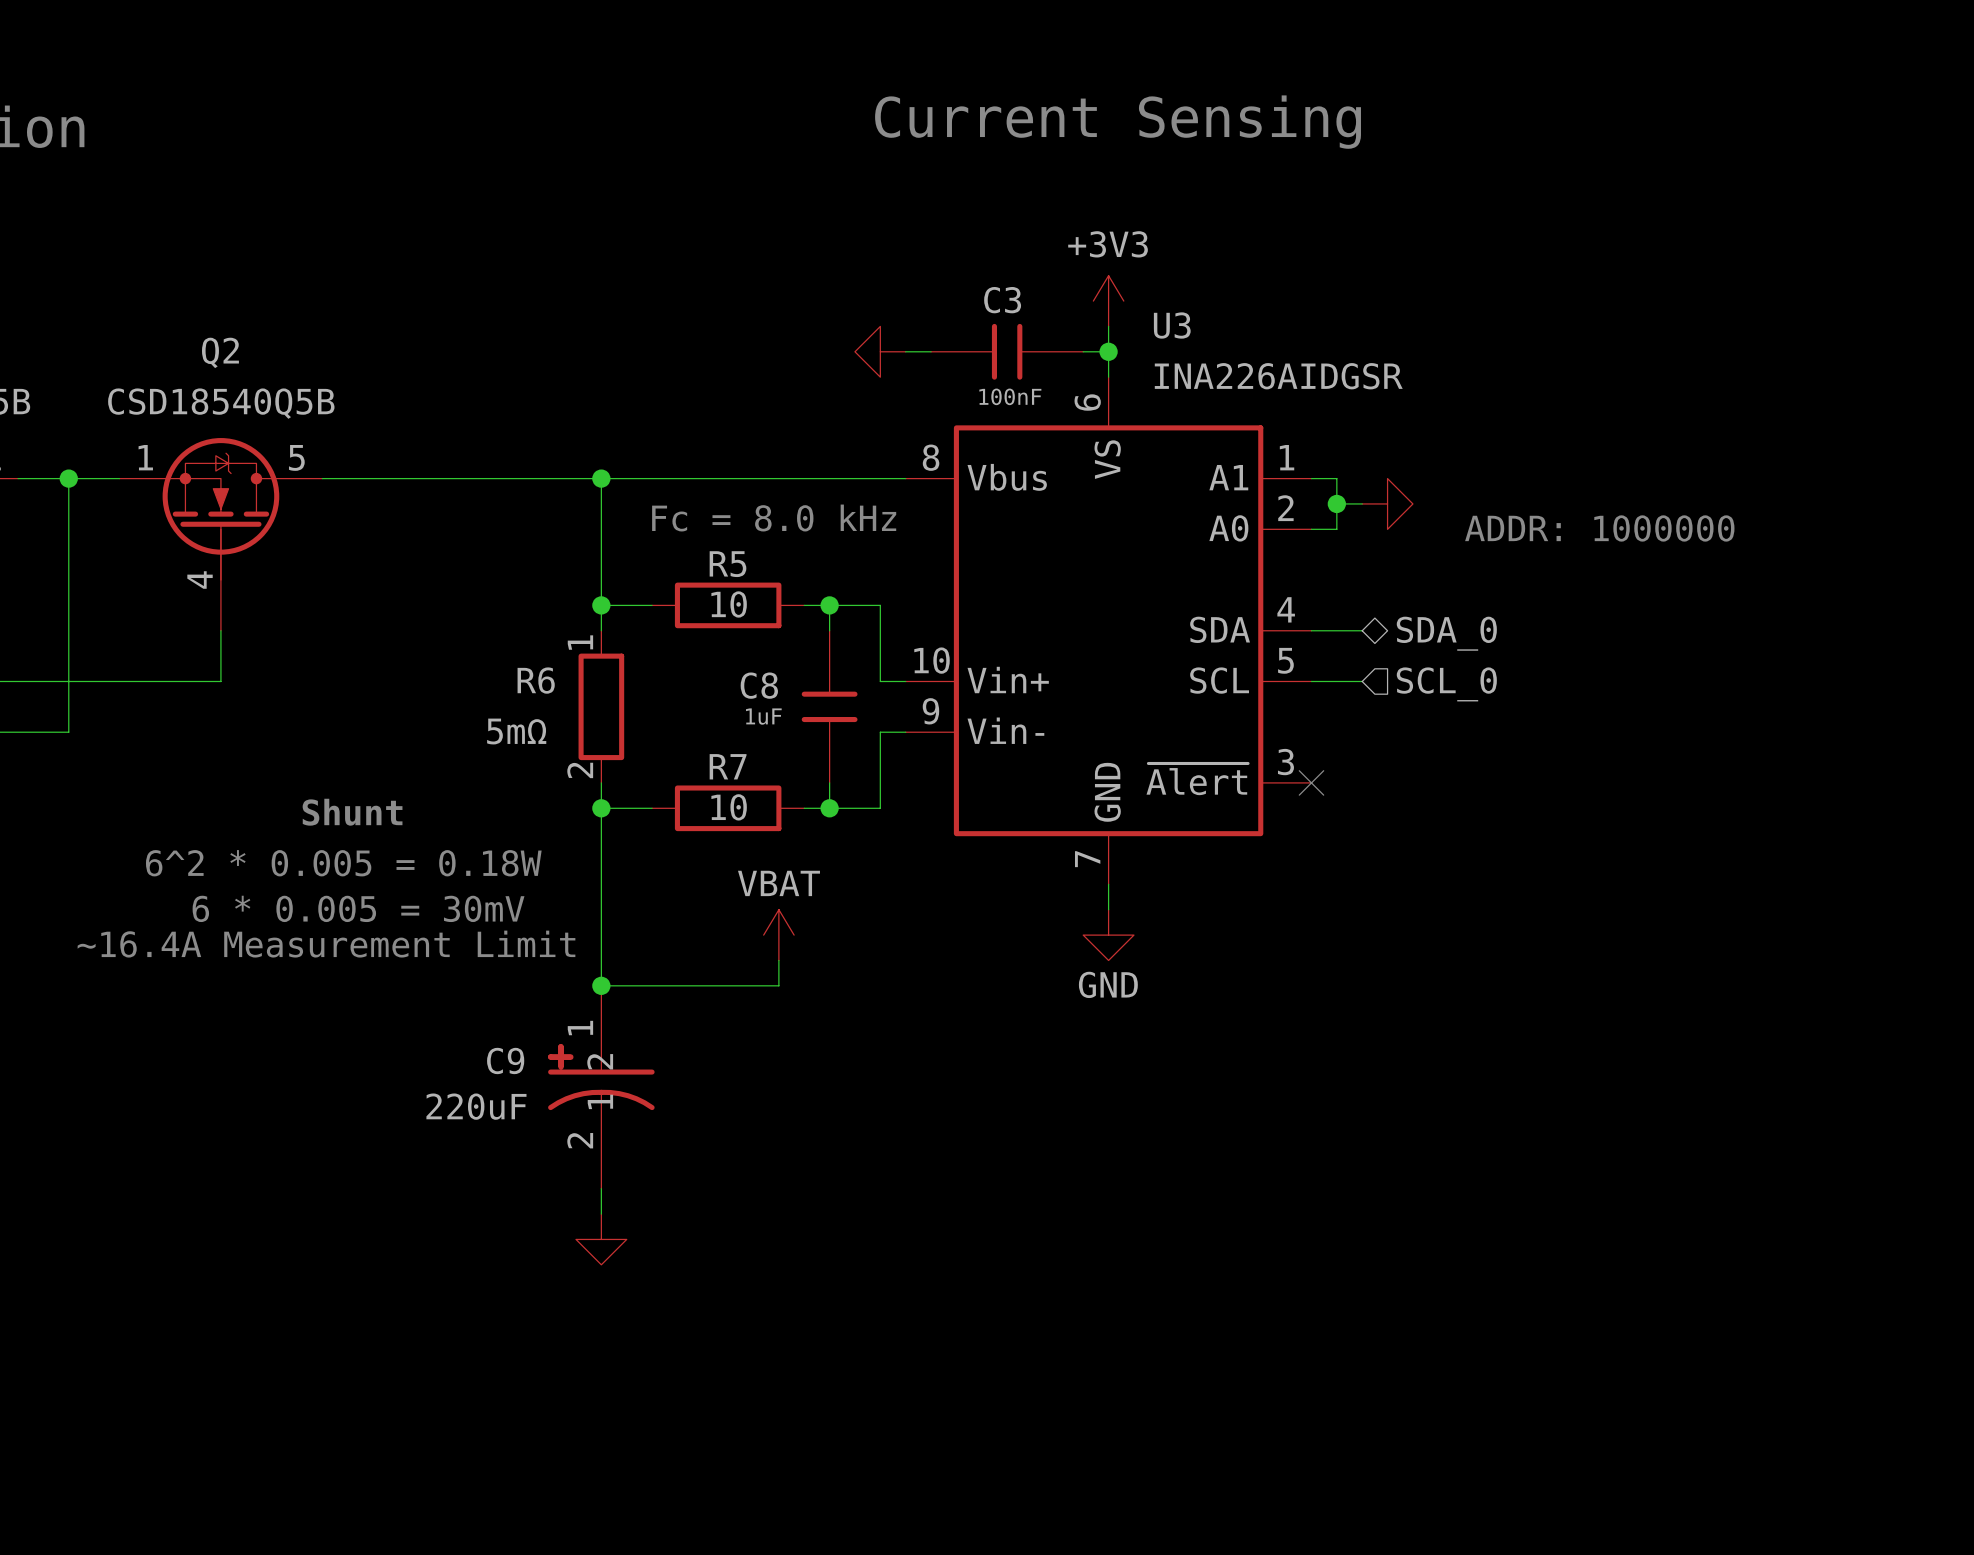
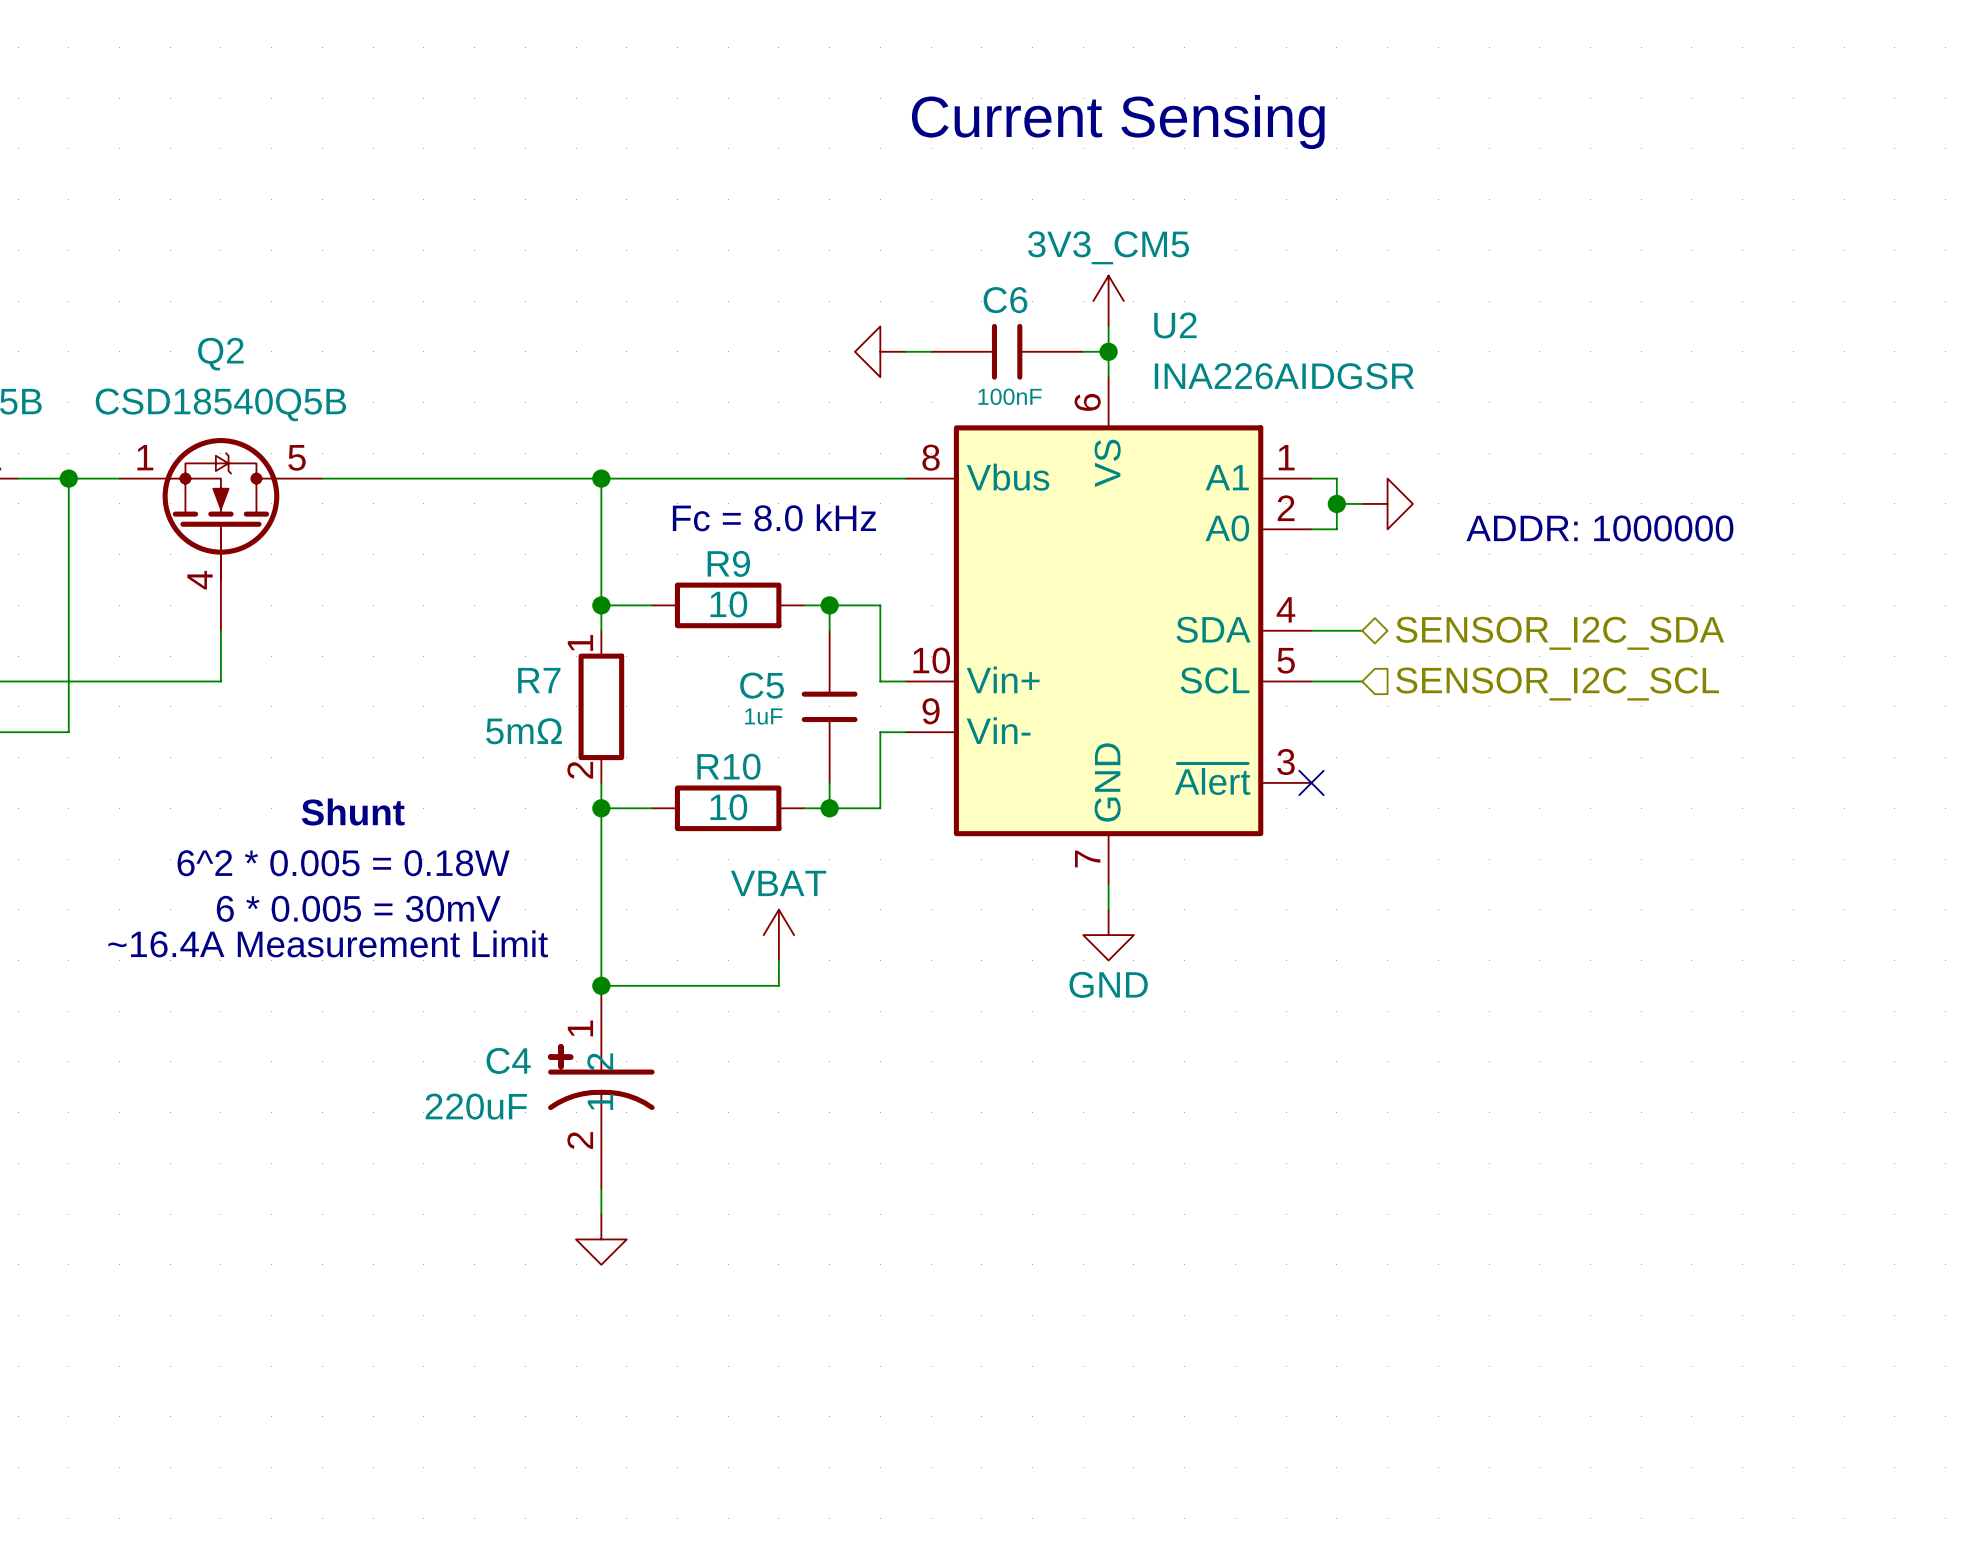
C3 name: C3 (1002, 300) -> C6 (1005, 300)
power symbol: +3V3 (1108, 301) -> 3V3_CM5 (1108, 301)
U3 name: U3 (1172, 325) -> U2 (1175, 325)
R5 name: R5 (727, 564) -> R9 (728, 563)
hierarchical label: SDA_0 (1446, 633) -> SENSOR_I2C_SDA (1560, 633)
R6 name: R6 (536, 680) -> R7 (539, 680)
hierarchical label: SCL_0 (1446, 684) -> SENSOR_I2C_SCL (1557, 684)
C8 name: C8 (759, 685) -> C5 (762, 685)
R7 name: R7 (728, 766) -> R10 (728, 766)
C9 name: C9 (505, 1060) -> C4 (508, 1060)

